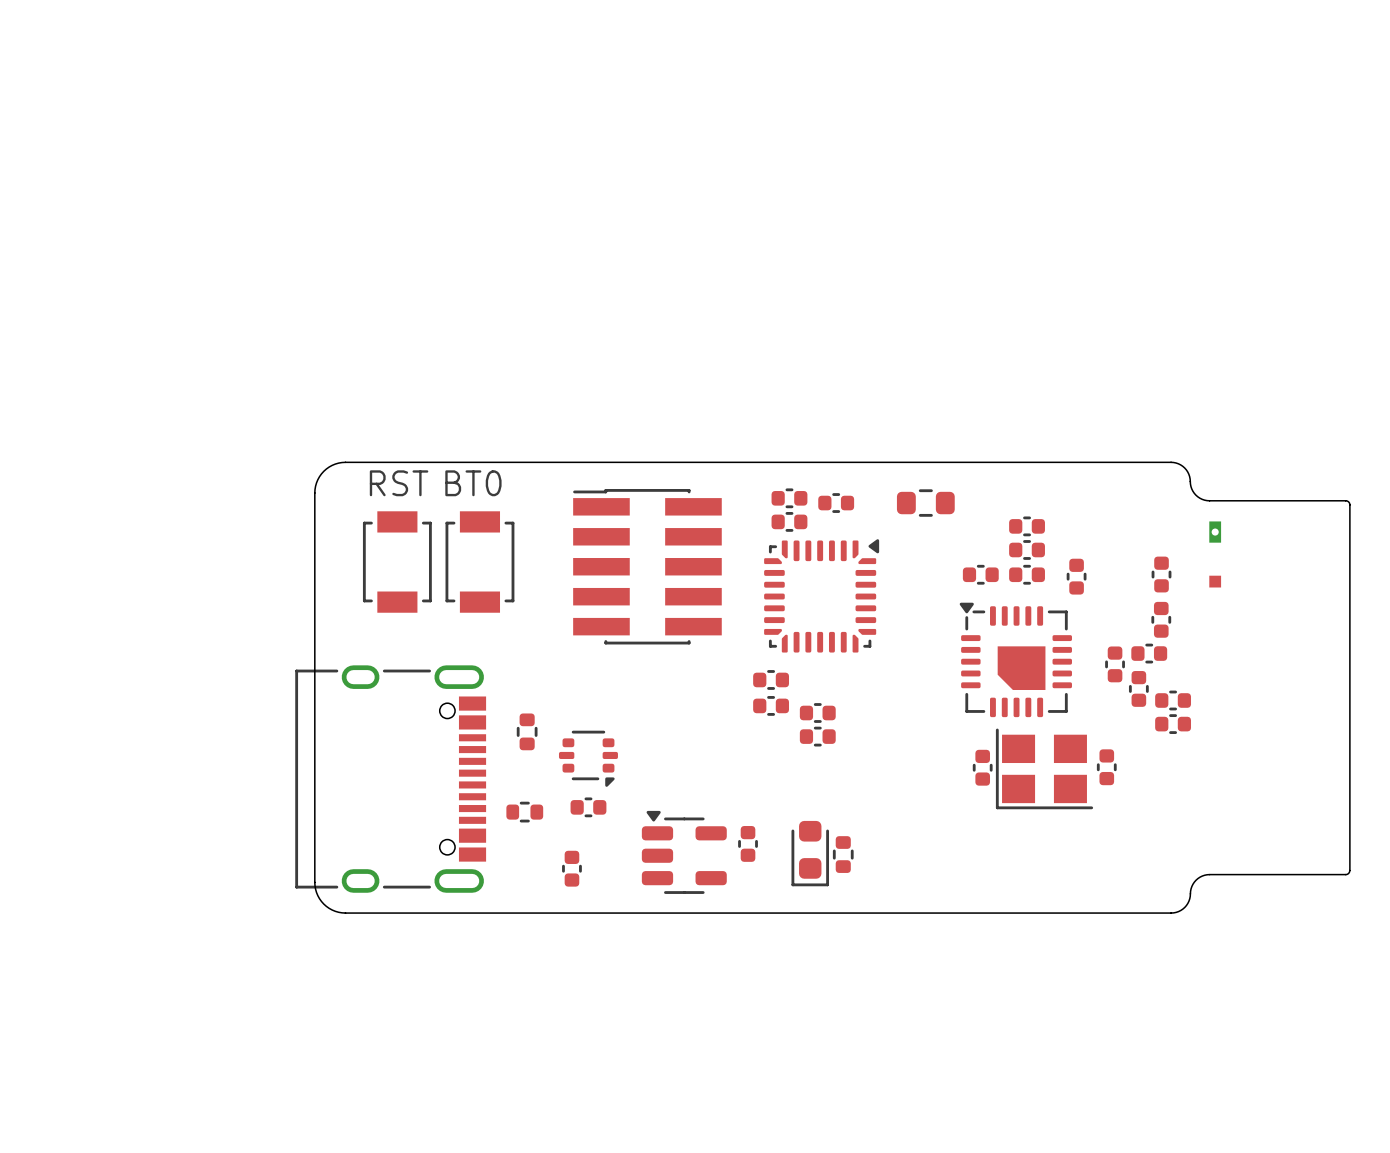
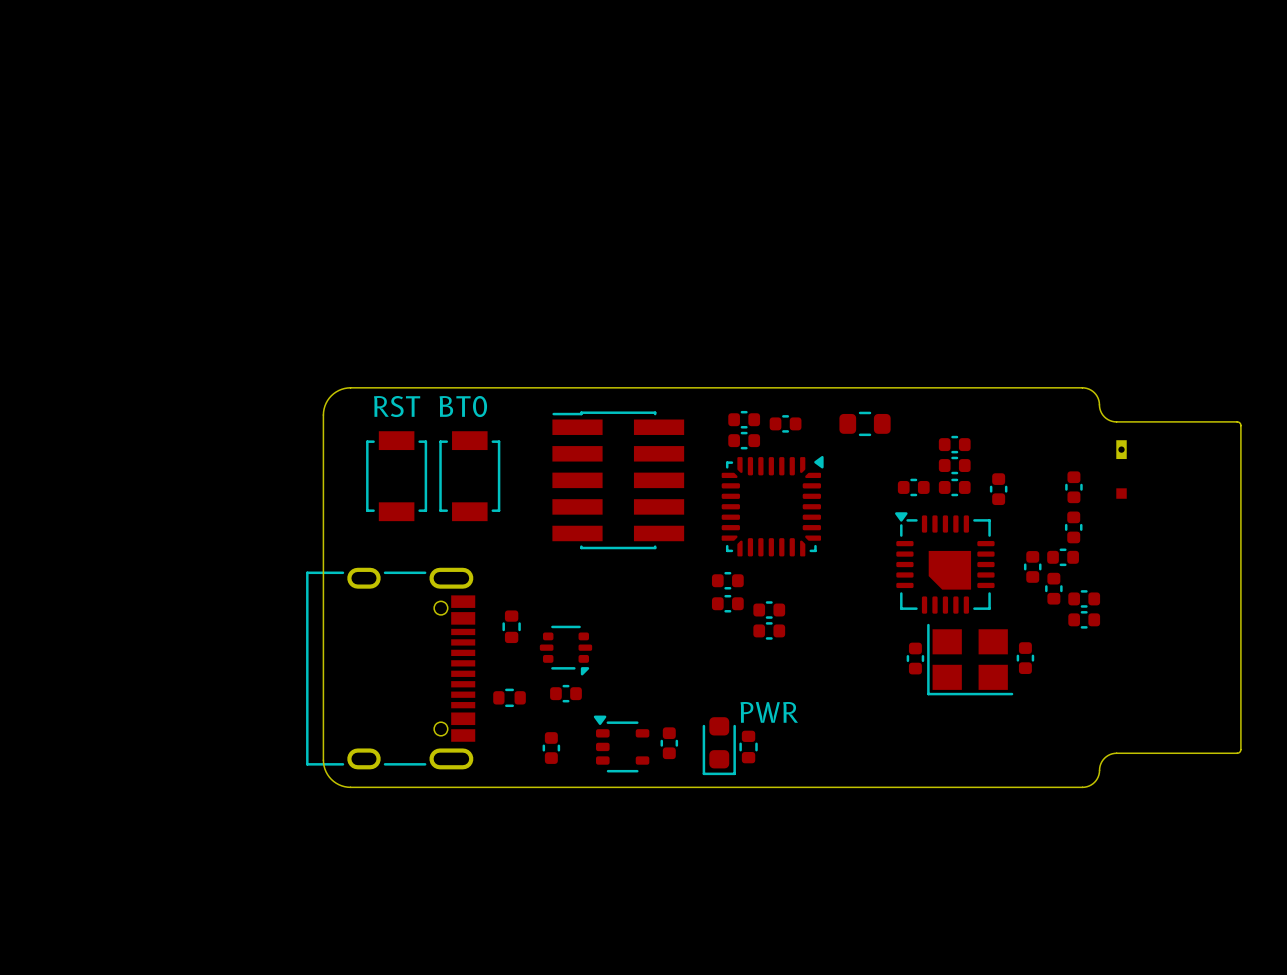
part footprint: [791, 820, 829, 887] -> [739, 730, 758, 764]
text: none -> PWR (769, 712)
part position: (748, 843) -> (669, 743)
part: (684, 852) -> none
part: (843, 854) -> none
part: none -> (621, 744)
part: none -> (719, 746)

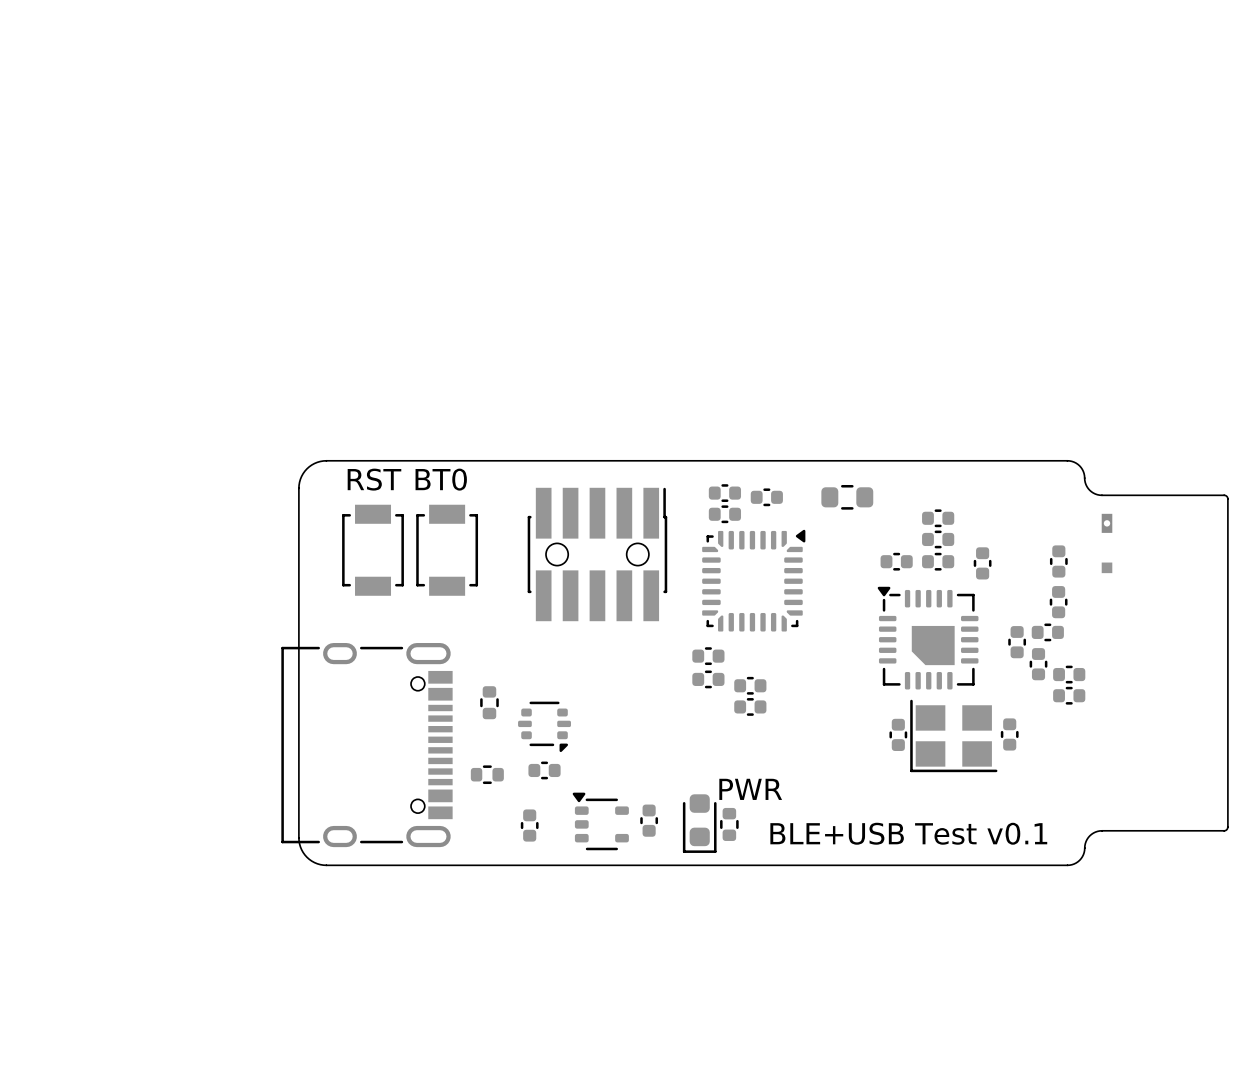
part footprint: [552, 411, 685, 550] -> [527, 487, 668, 622]
text: none -> BLE+USB Test v0.1 (908, 833)

